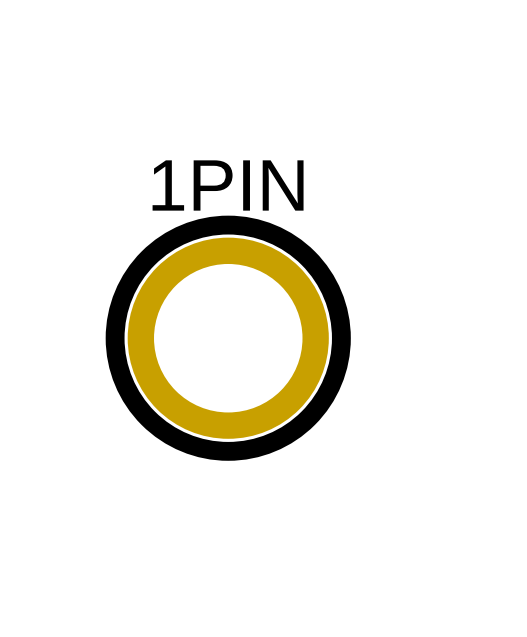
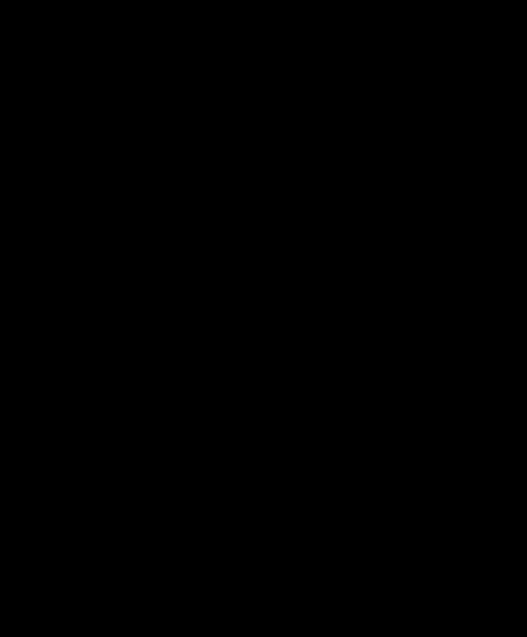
1PIN: (228, 338) -> none

